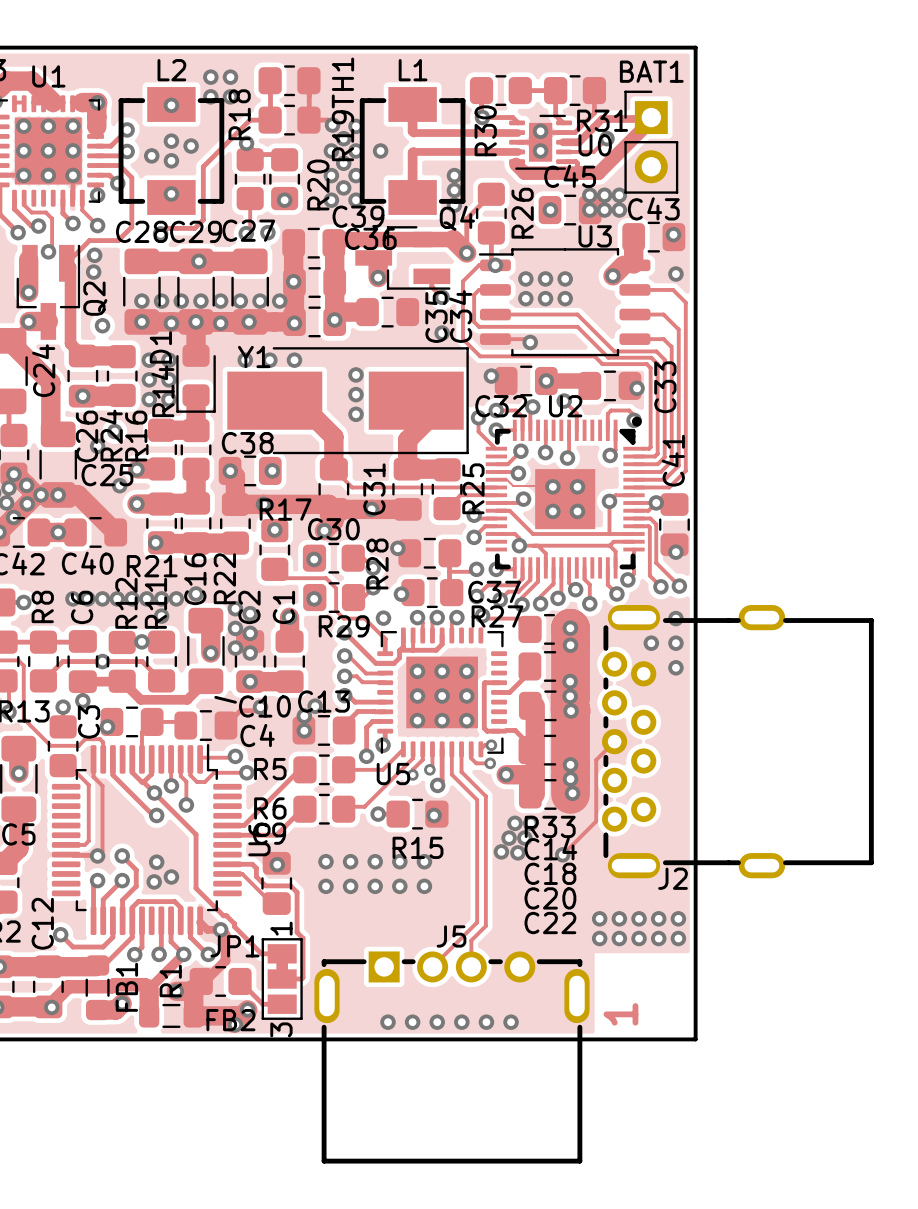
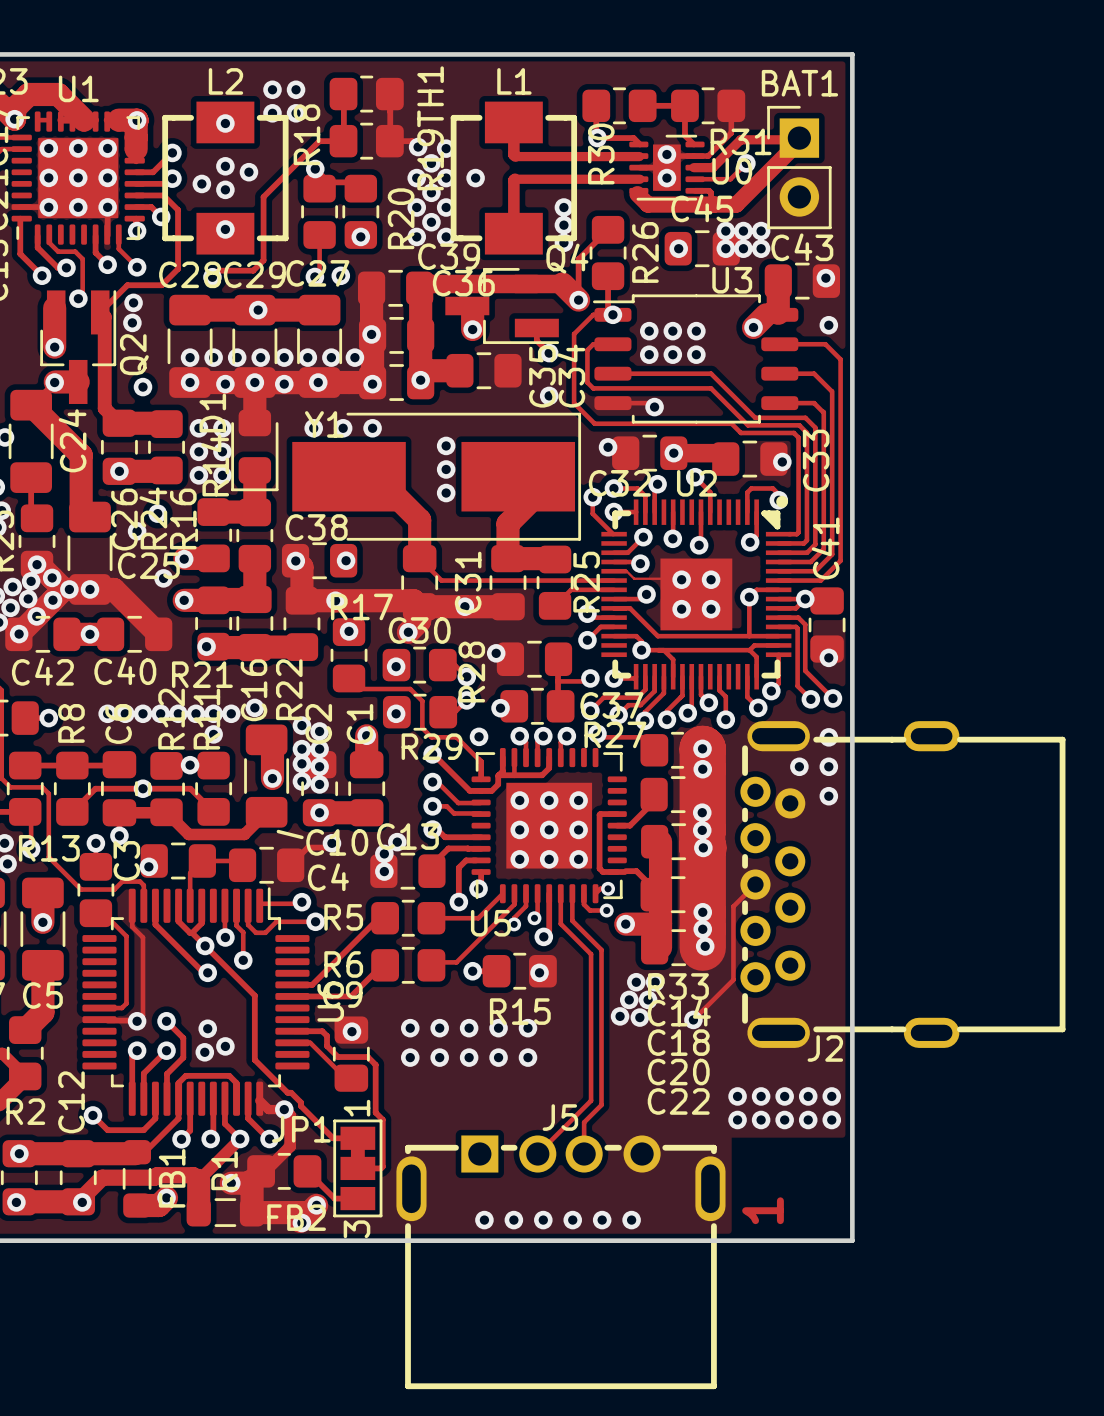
via: none -> (319, 749)
via: (250, 633) -> none
via: none -> (301, 763)
via: none -> (319, 766)
via: (235, 648) -> none
via: (250, 653) -> none
via: none -> (301, 781)
via: none -> (319, 784)

